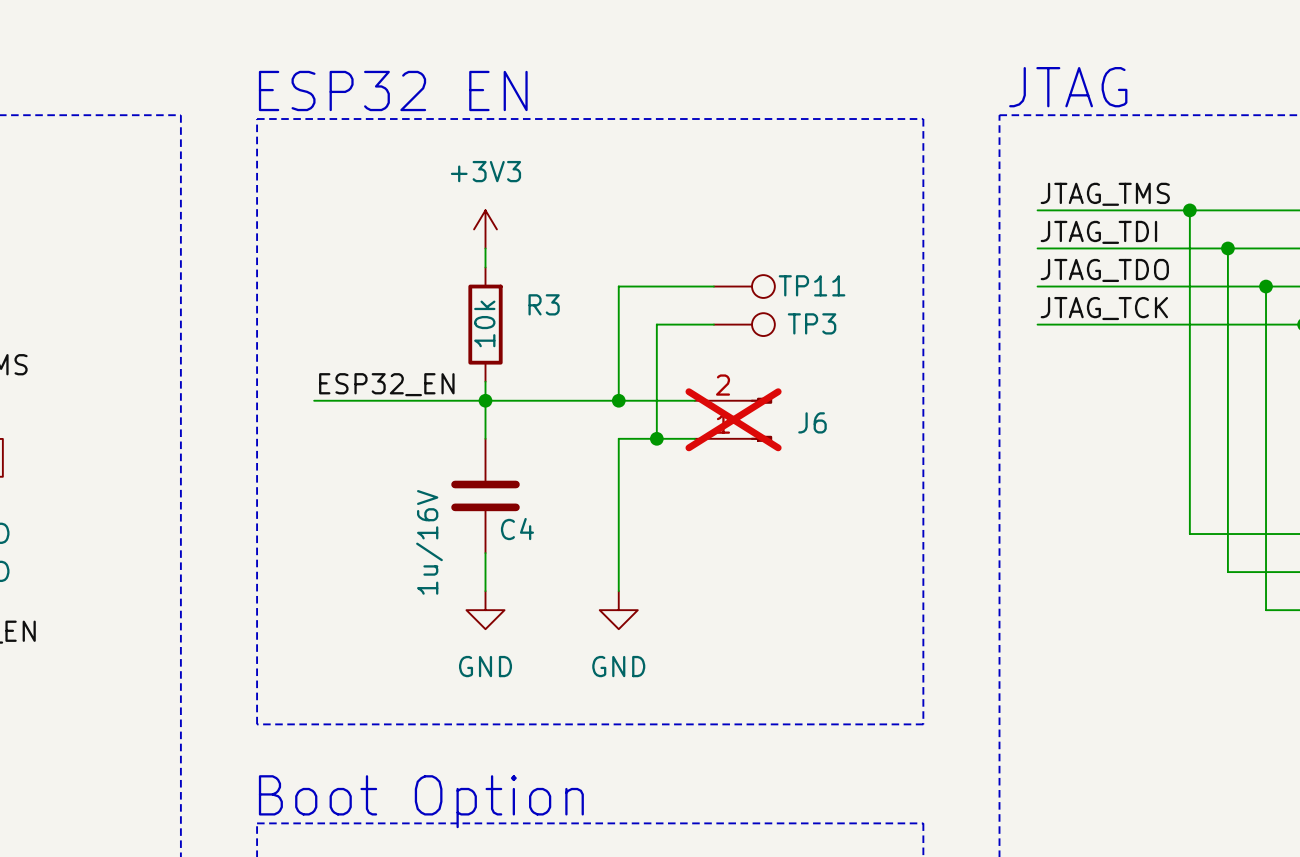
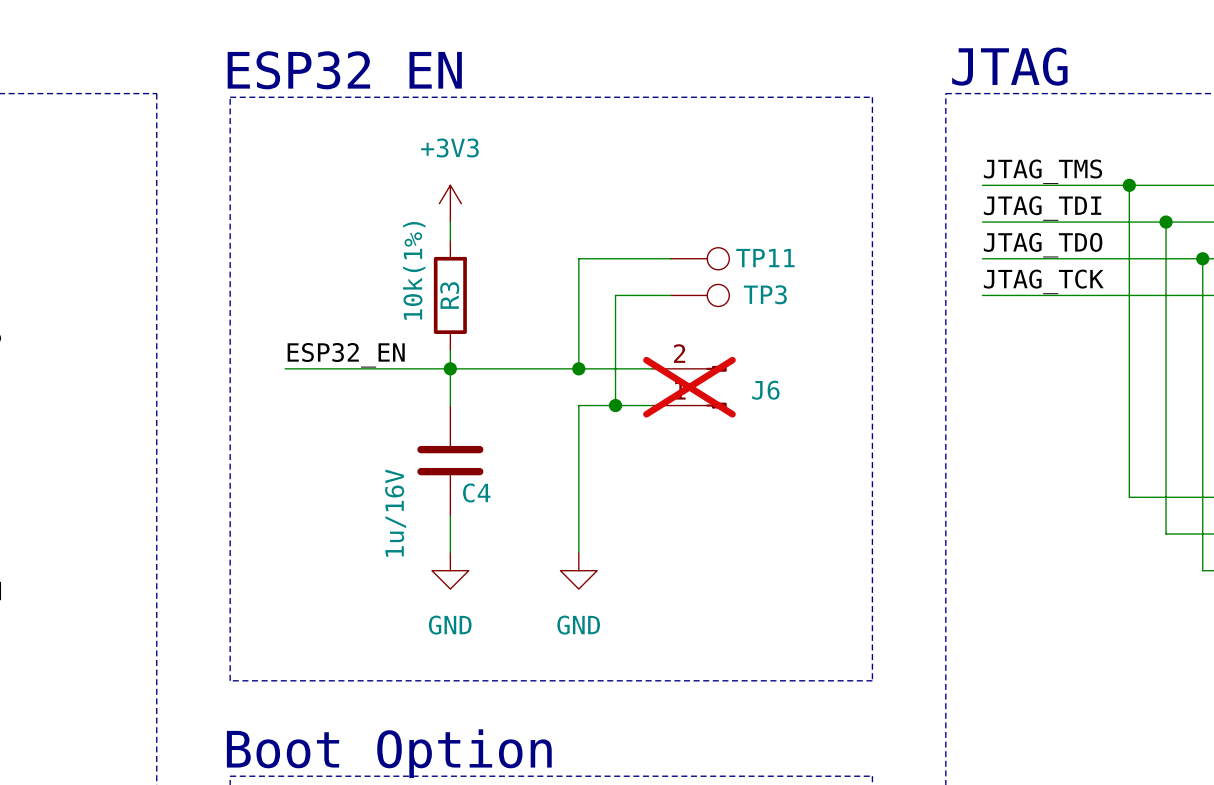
R3 name rotation: 0° (544, 304) -> 90° counterclockwise (449, 295)
R3 name position: R3 (544, 304) -> R3 (449, 295)
R3 value: 10k (484, 323) -> 10k(1%) (414, 270)

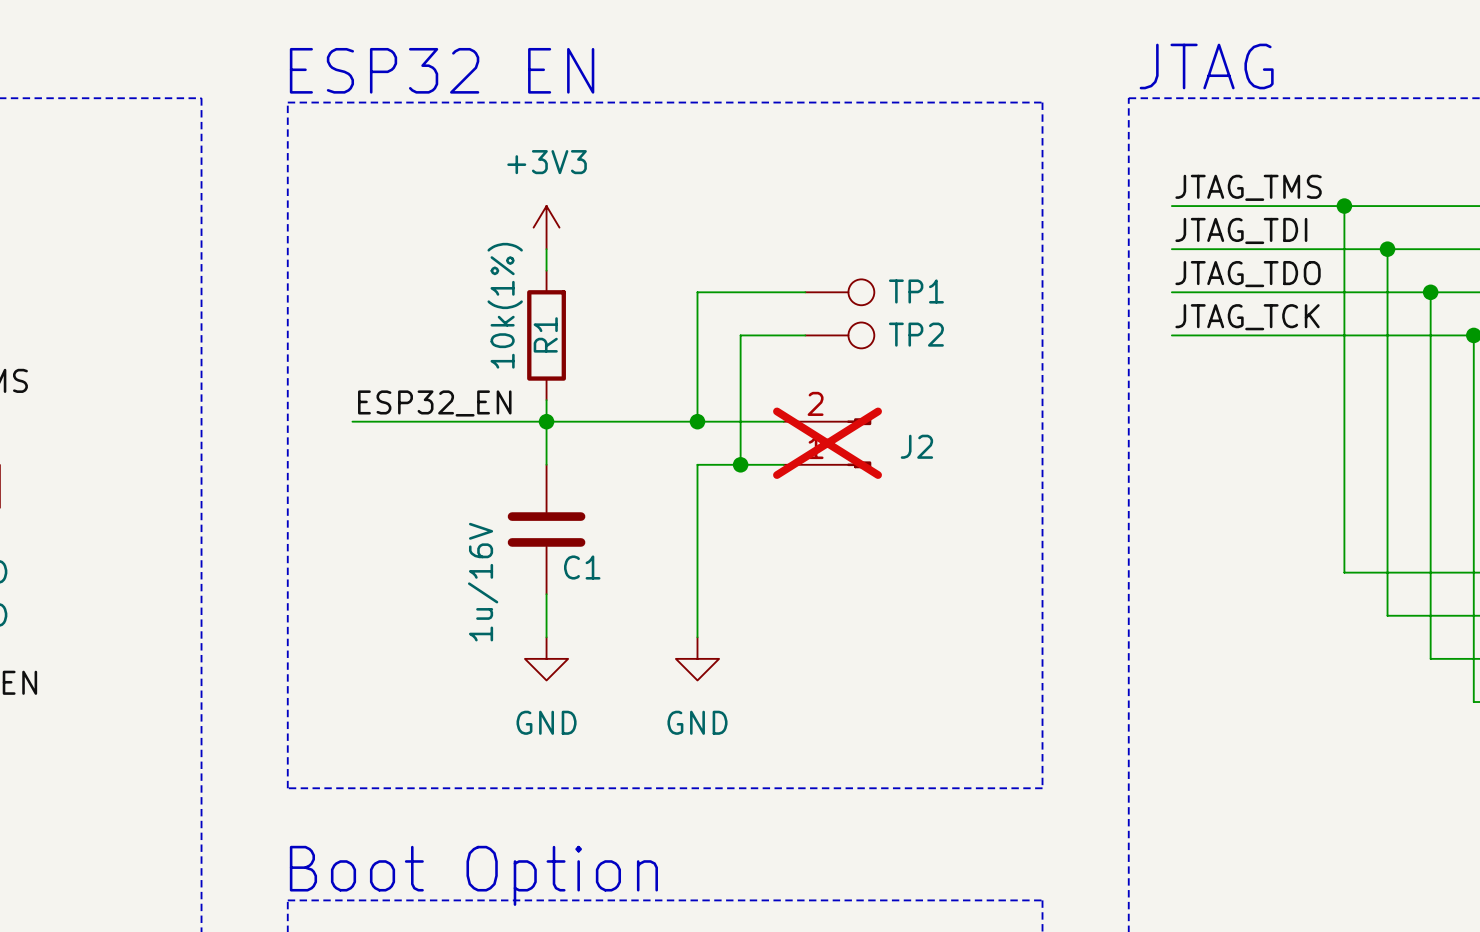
TP11 name: TP11 (765, 258) -> TP1 (916, 291)
TP3 name: TP3 (765, 294) -> TP2 (916, 334)
R3 name: R3 (449, 295) -> R1 (545, 334)
J6 name: J6 (765, 390) -> J2 (916, 446)
C4 name: C4 (476, 492) -> C1 (582, 567)

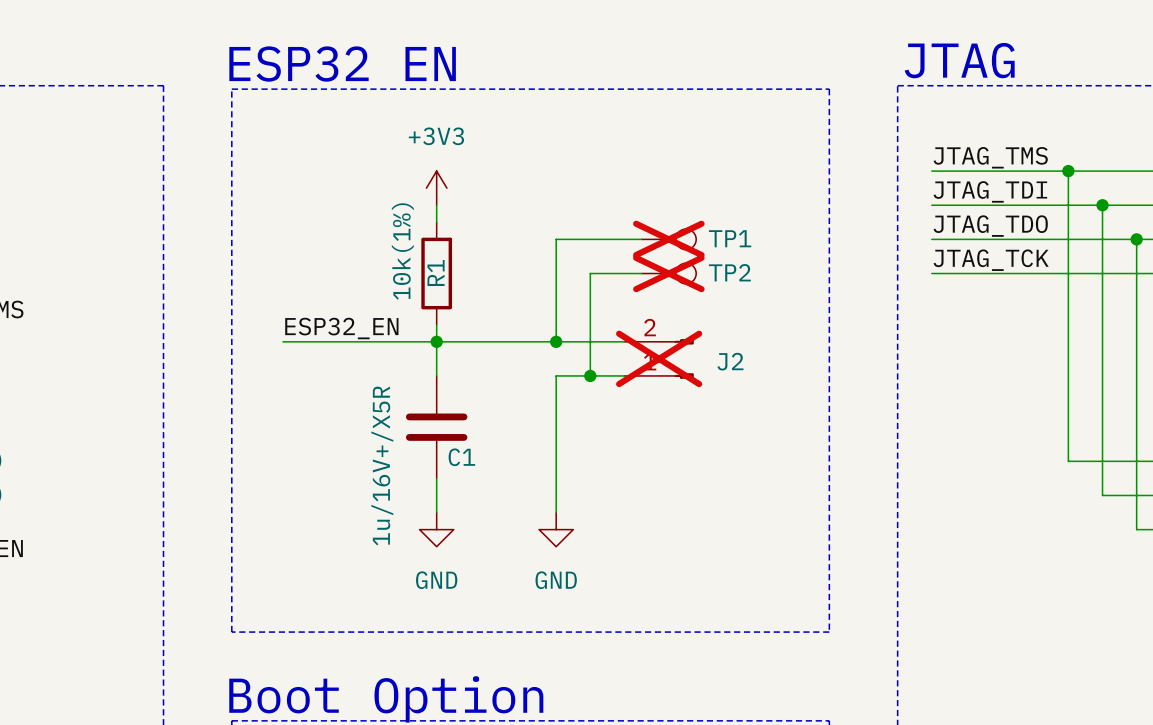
TP1 do-not-place cross: none -> (668, 239)
TP2 do-not-place cross: none -> (668, 273)
C1 value: 1u/16V (483, 582) -> 1u/16V+/X5R (382, 465)

